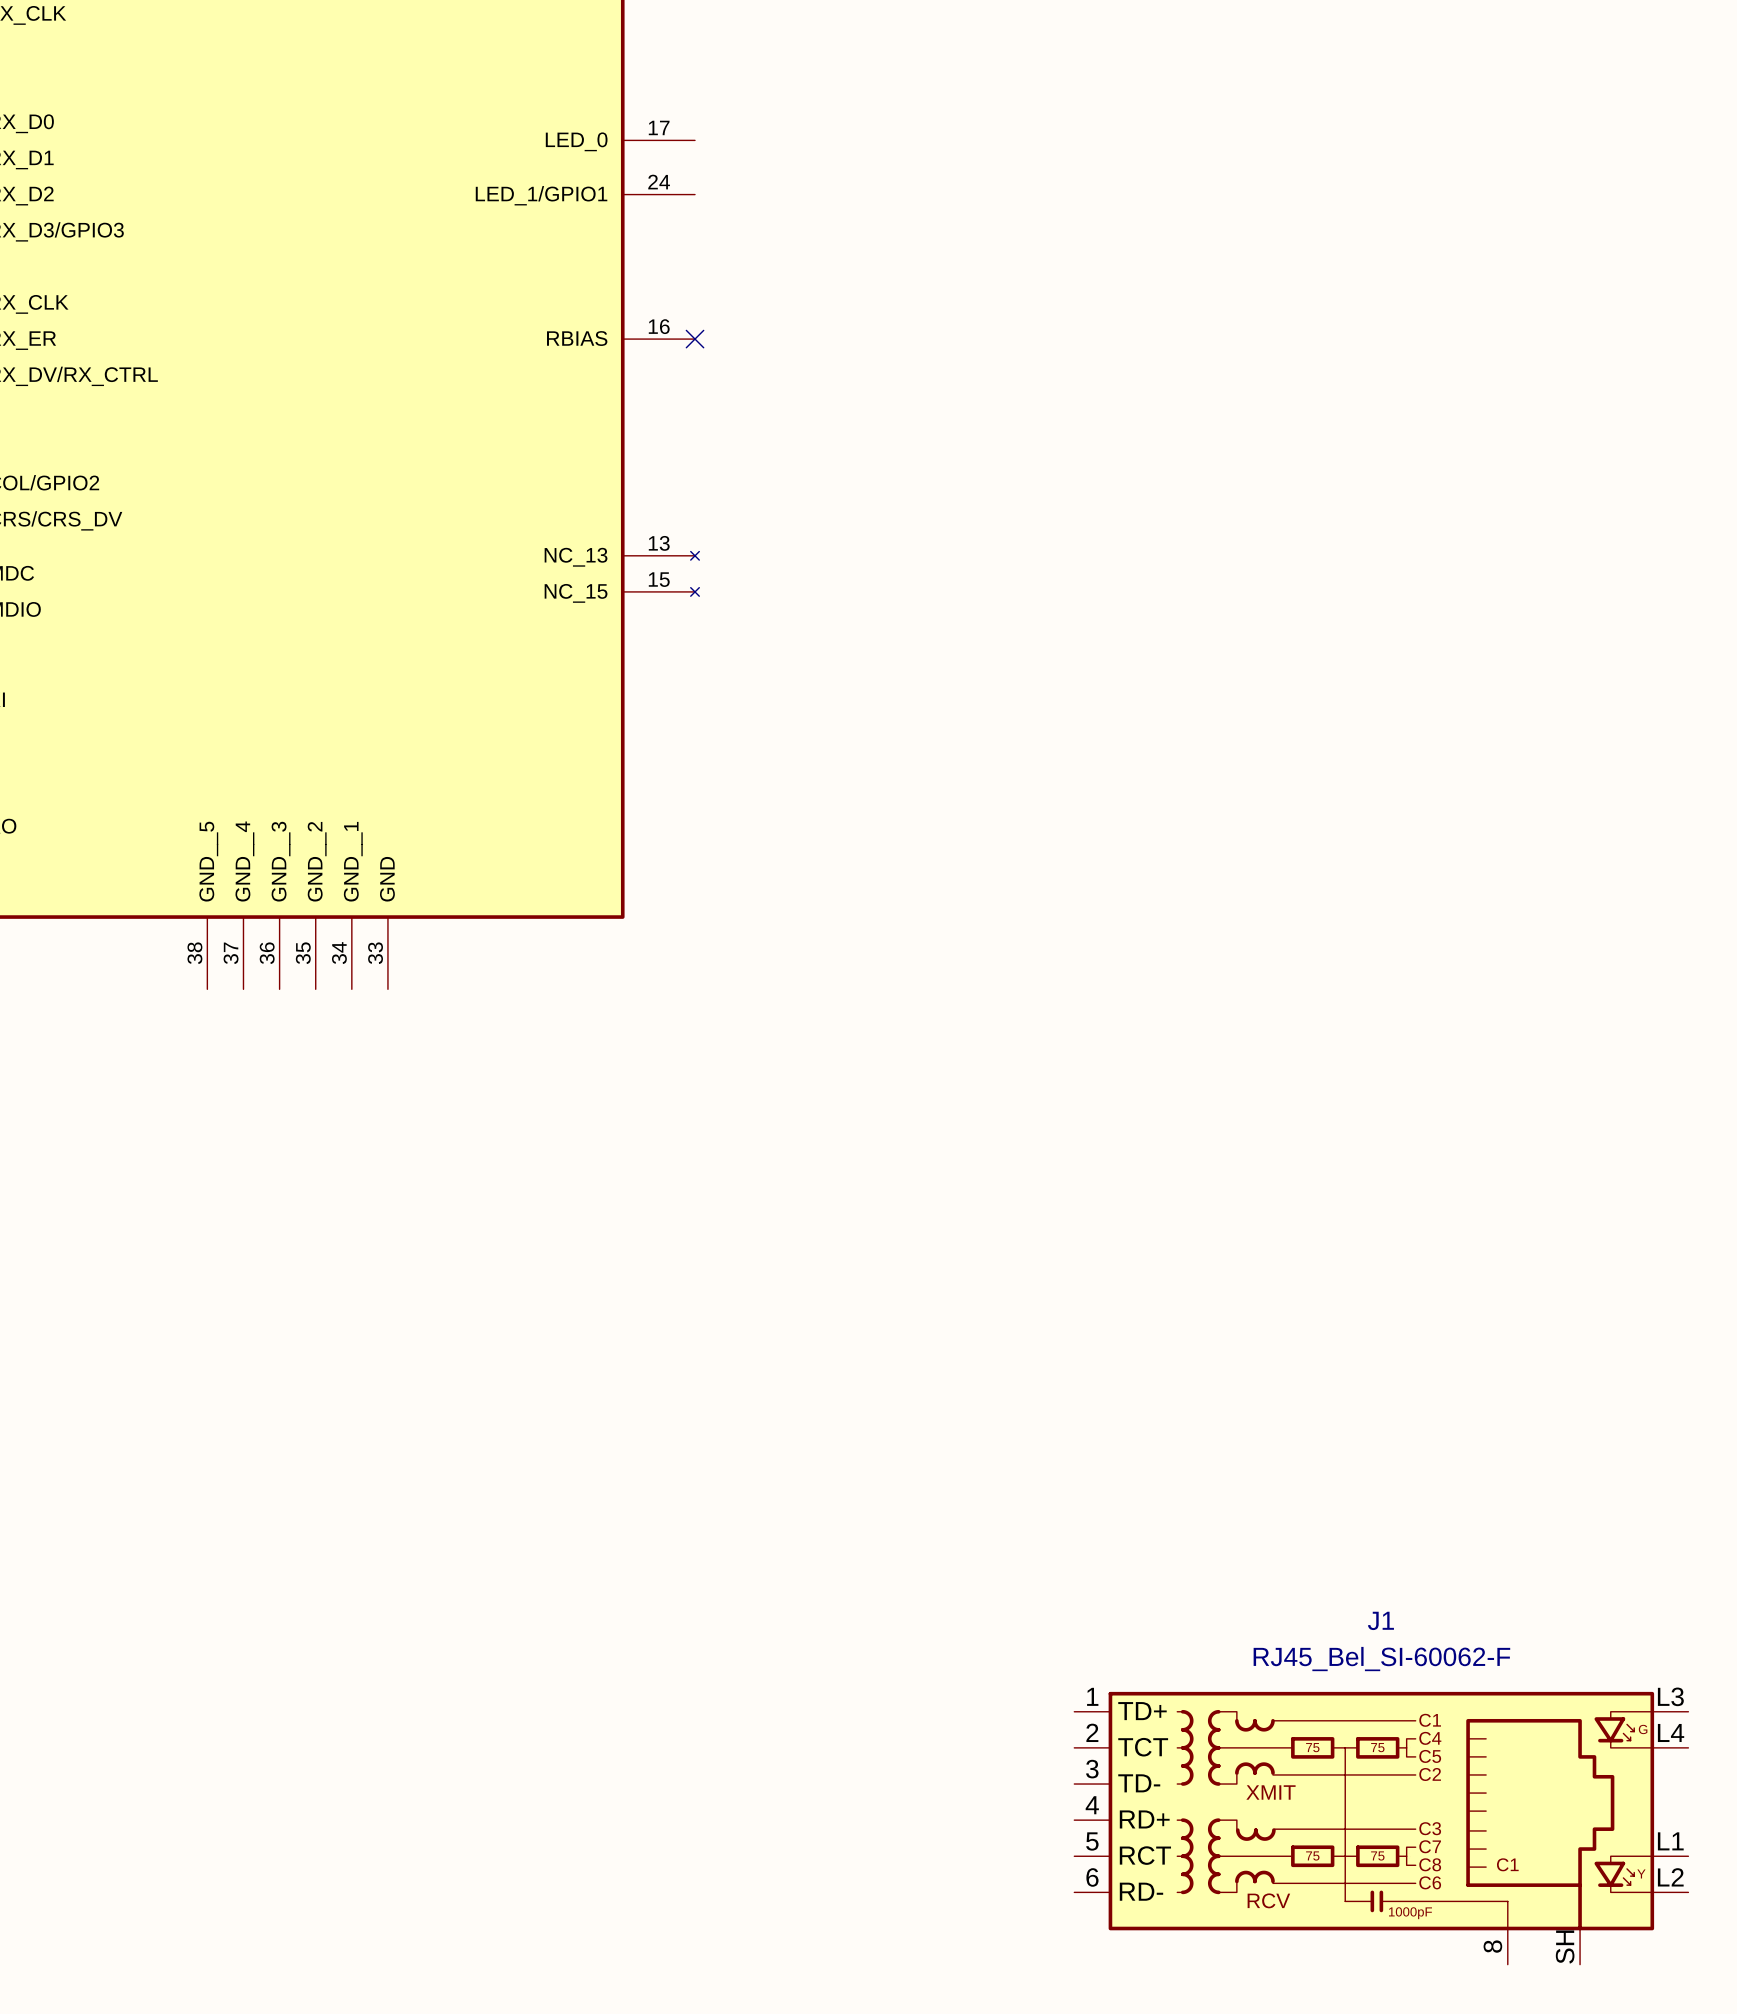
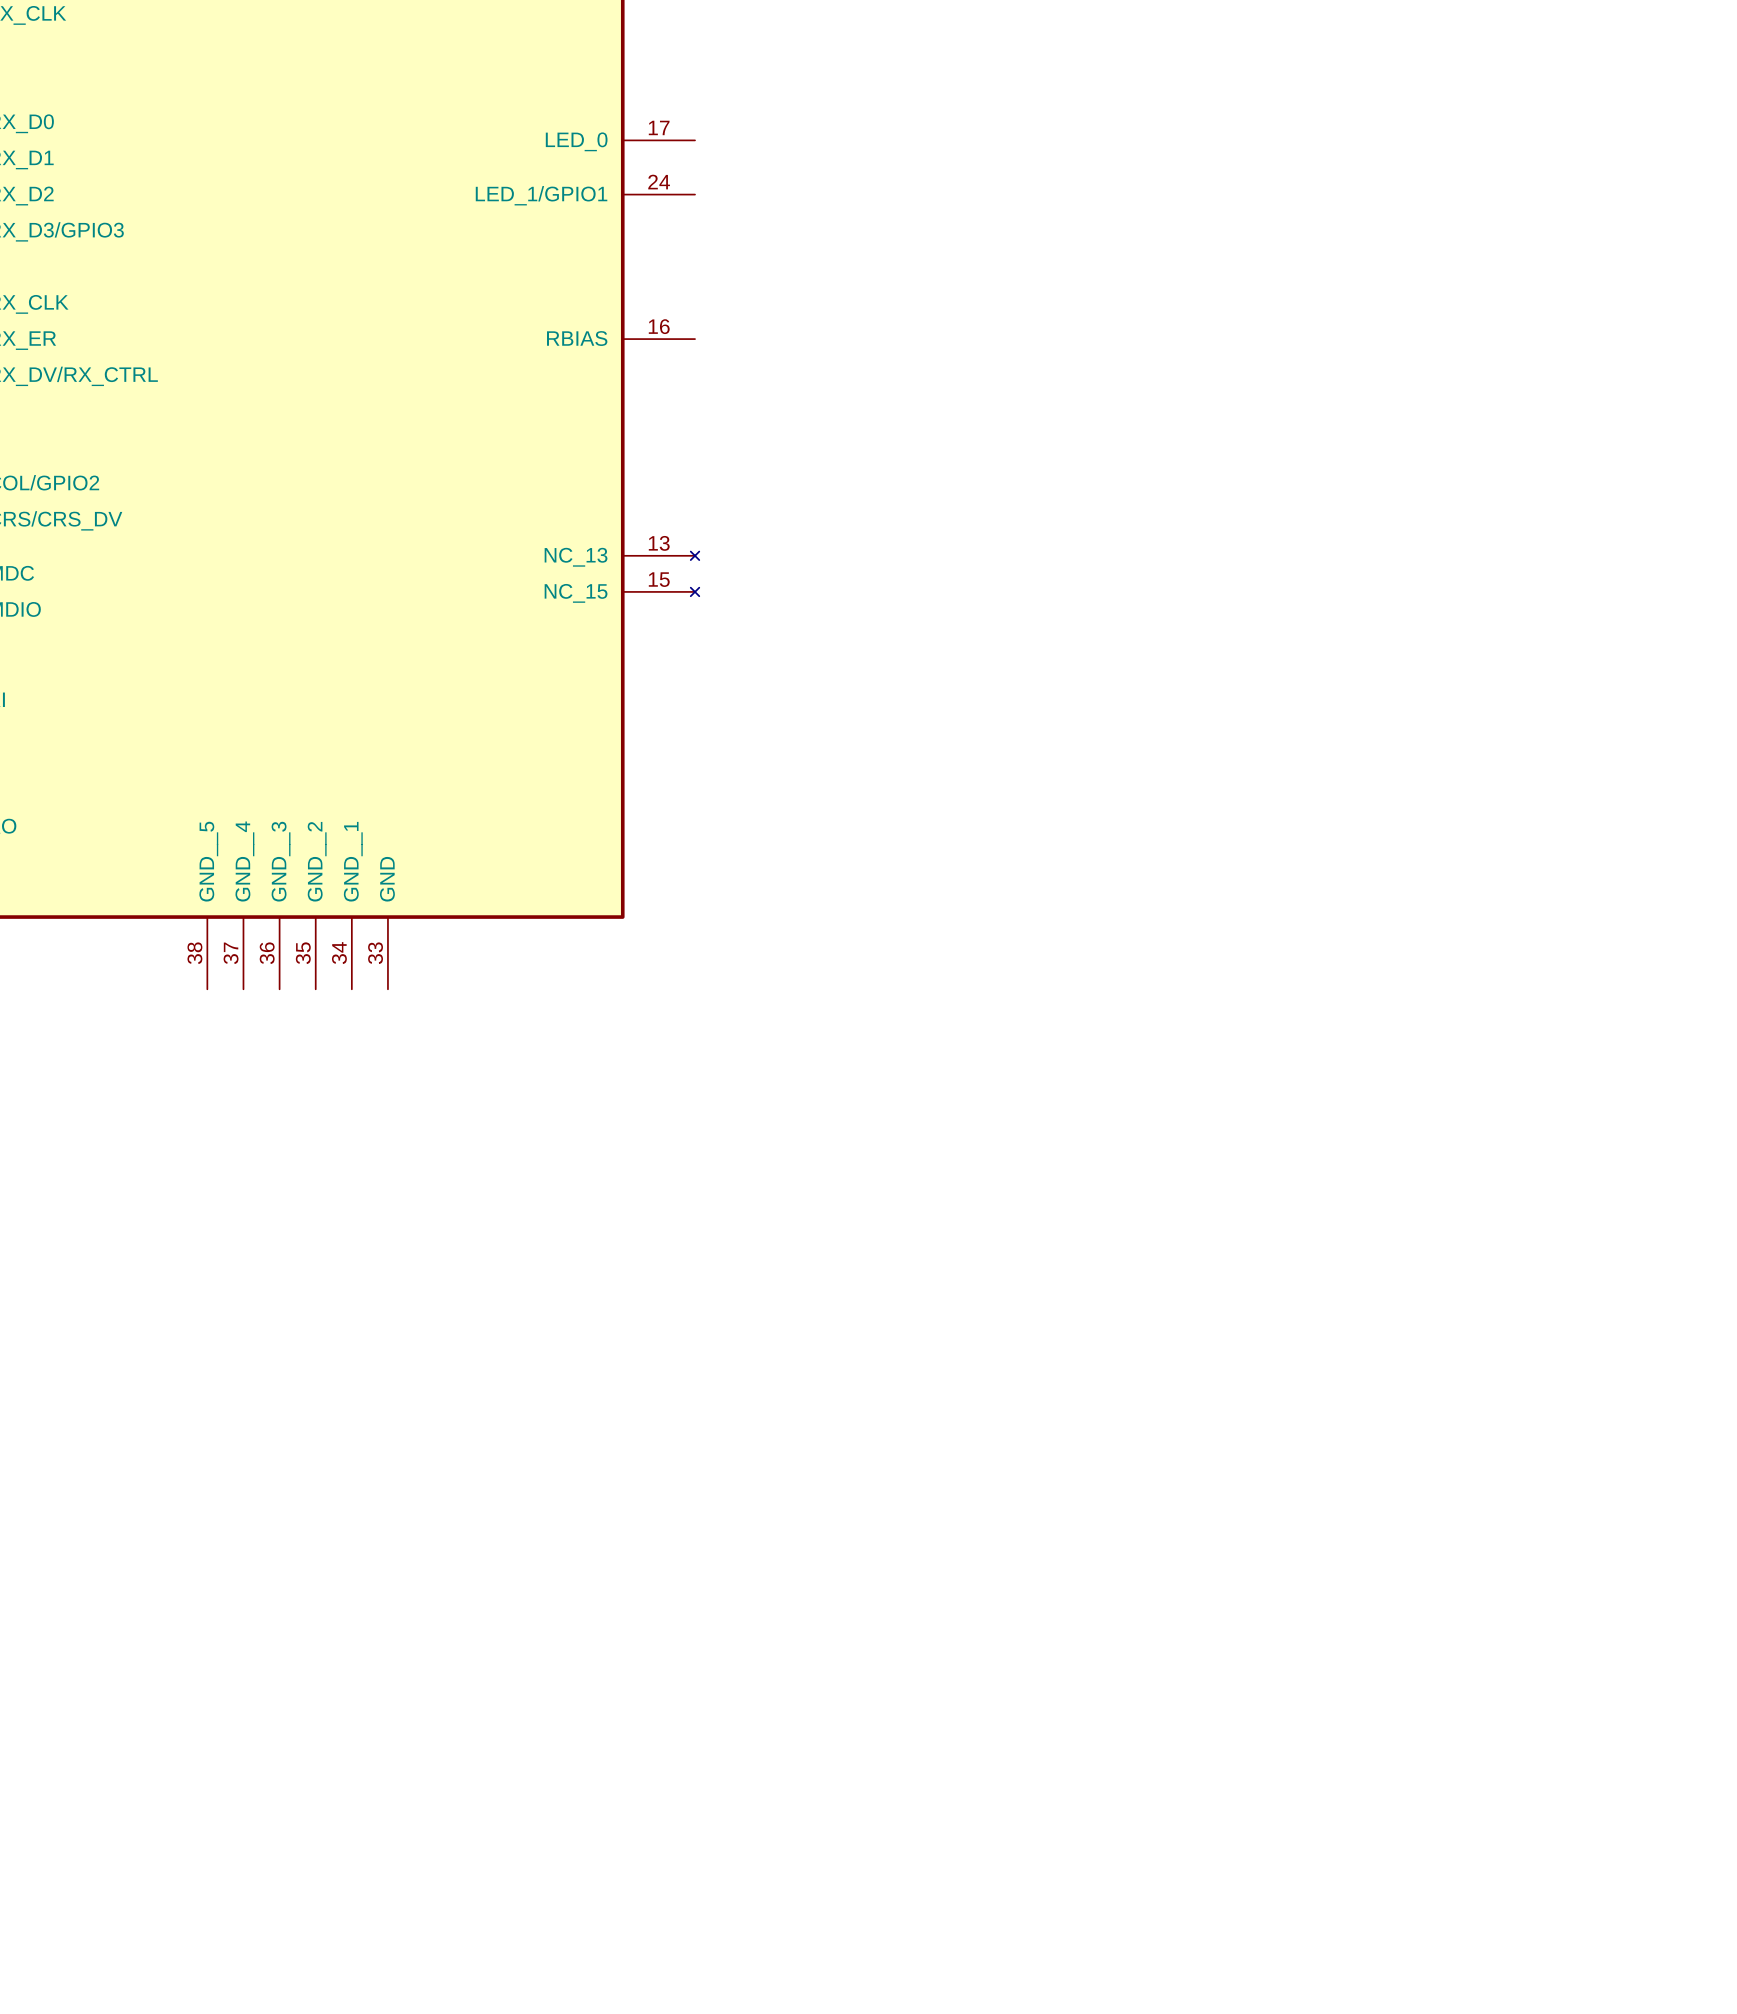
no-connect mark: (695, 339) -> none
J1: RJ45_Bel_SI-60062-F (1381, 1828) -> none

